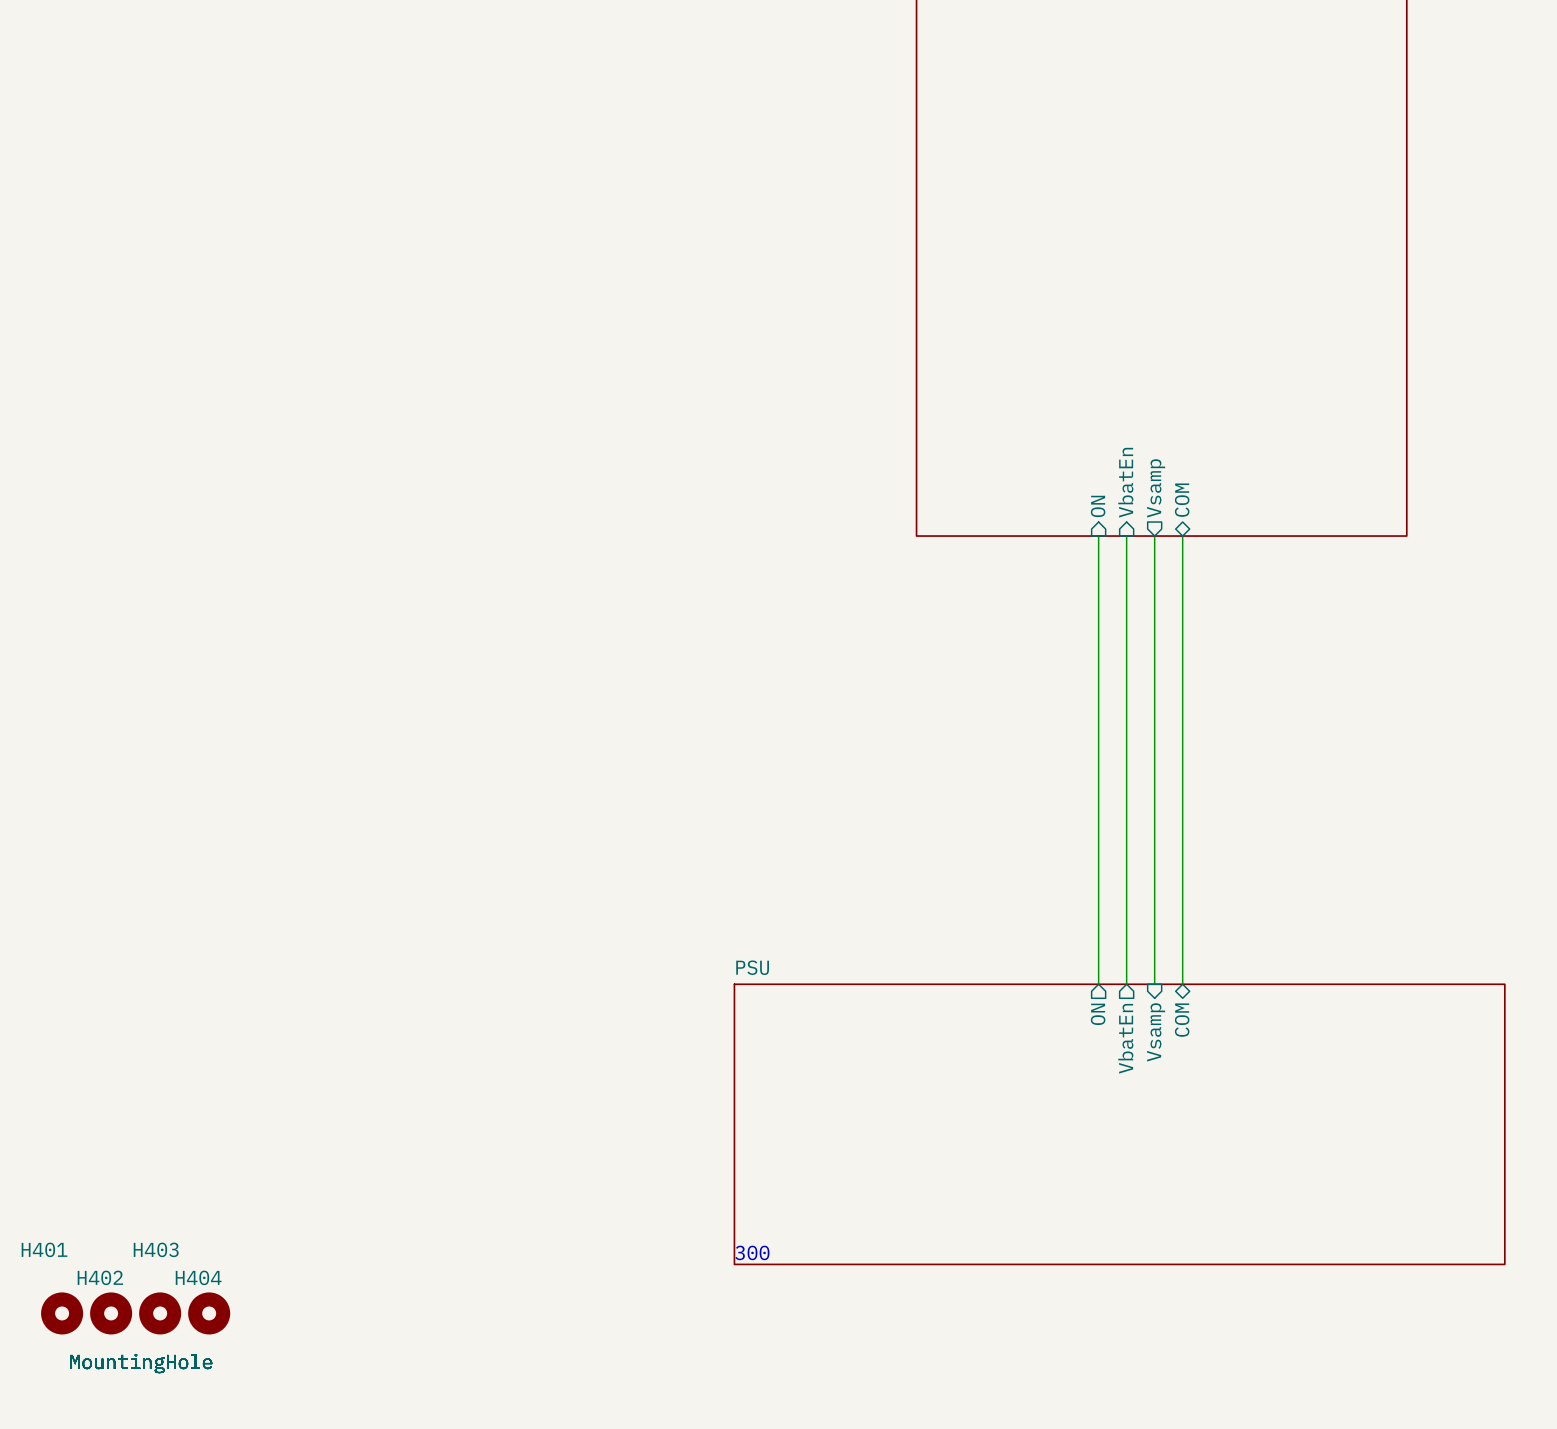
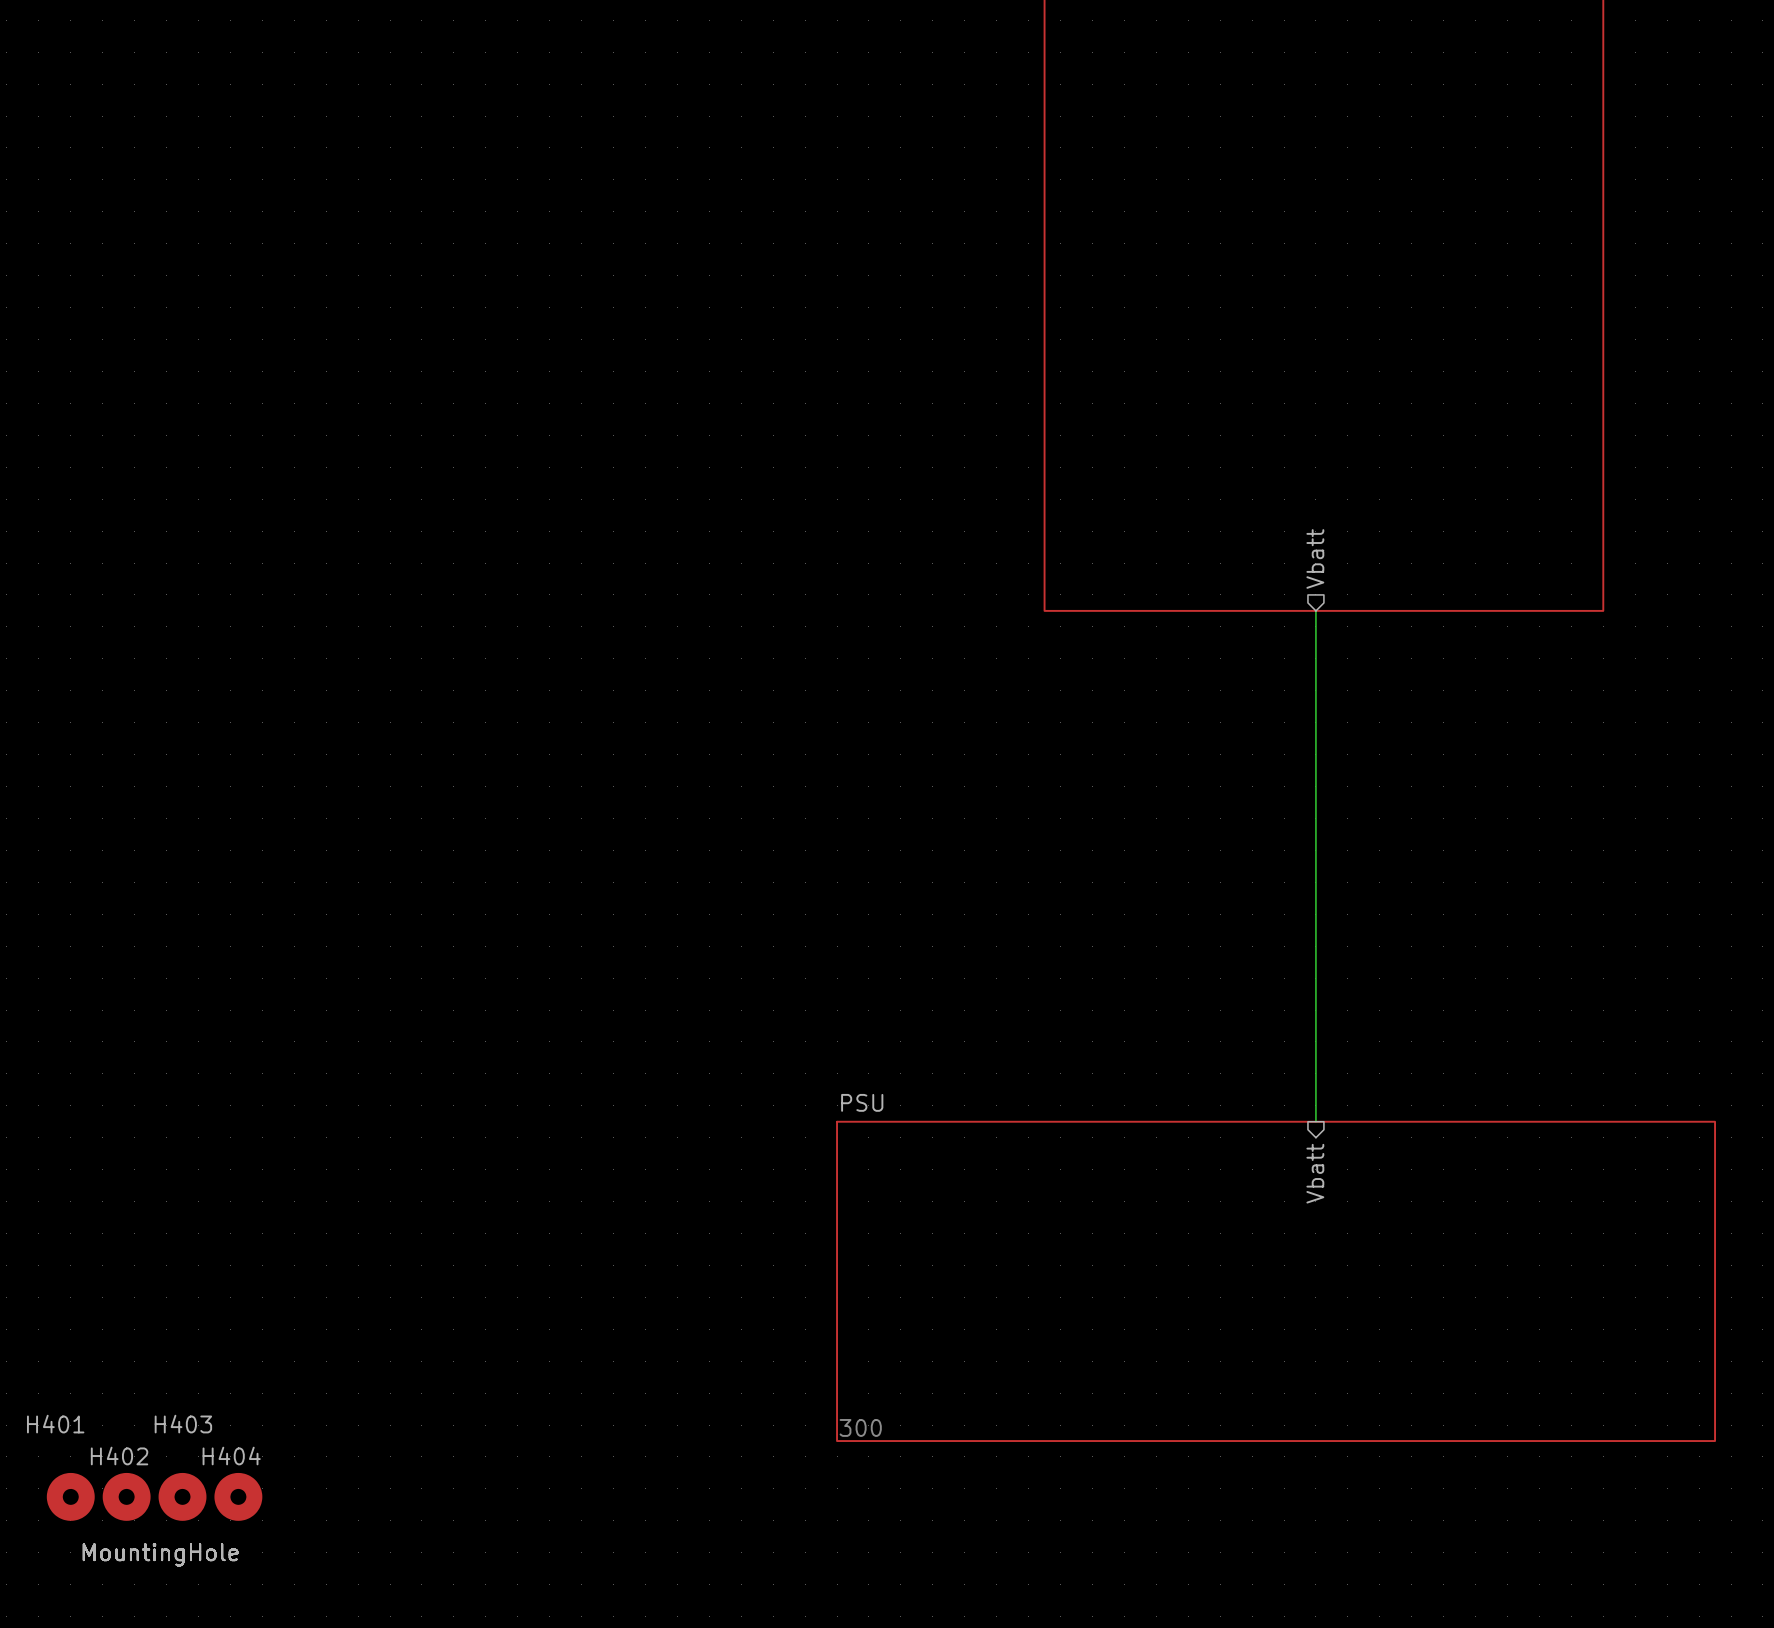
sheet pin: VbatEn (1125, 482) -> none
sheet pin: Vsamp (1156, 488) -> Vbatt (1315, 558)
sheet pin: COM (1182, 500) -> none
sheet pin: ON (1098, 506) -> none
wire: (1098, 536) (1098, 984) -> none
wire: (1126, 536) (1126, 984) -> none
wire: (1182, 536) (1182, 984) -> none
sheet pin: ON (1098, 1014) -> none
sheet pin: COM (1182, 1020) -> none
sheet pin: Vsamp (1156, 1032) -> Vbatt (1315, 1173)
sheet pin: VbatEn (1125, 1038) -> none

